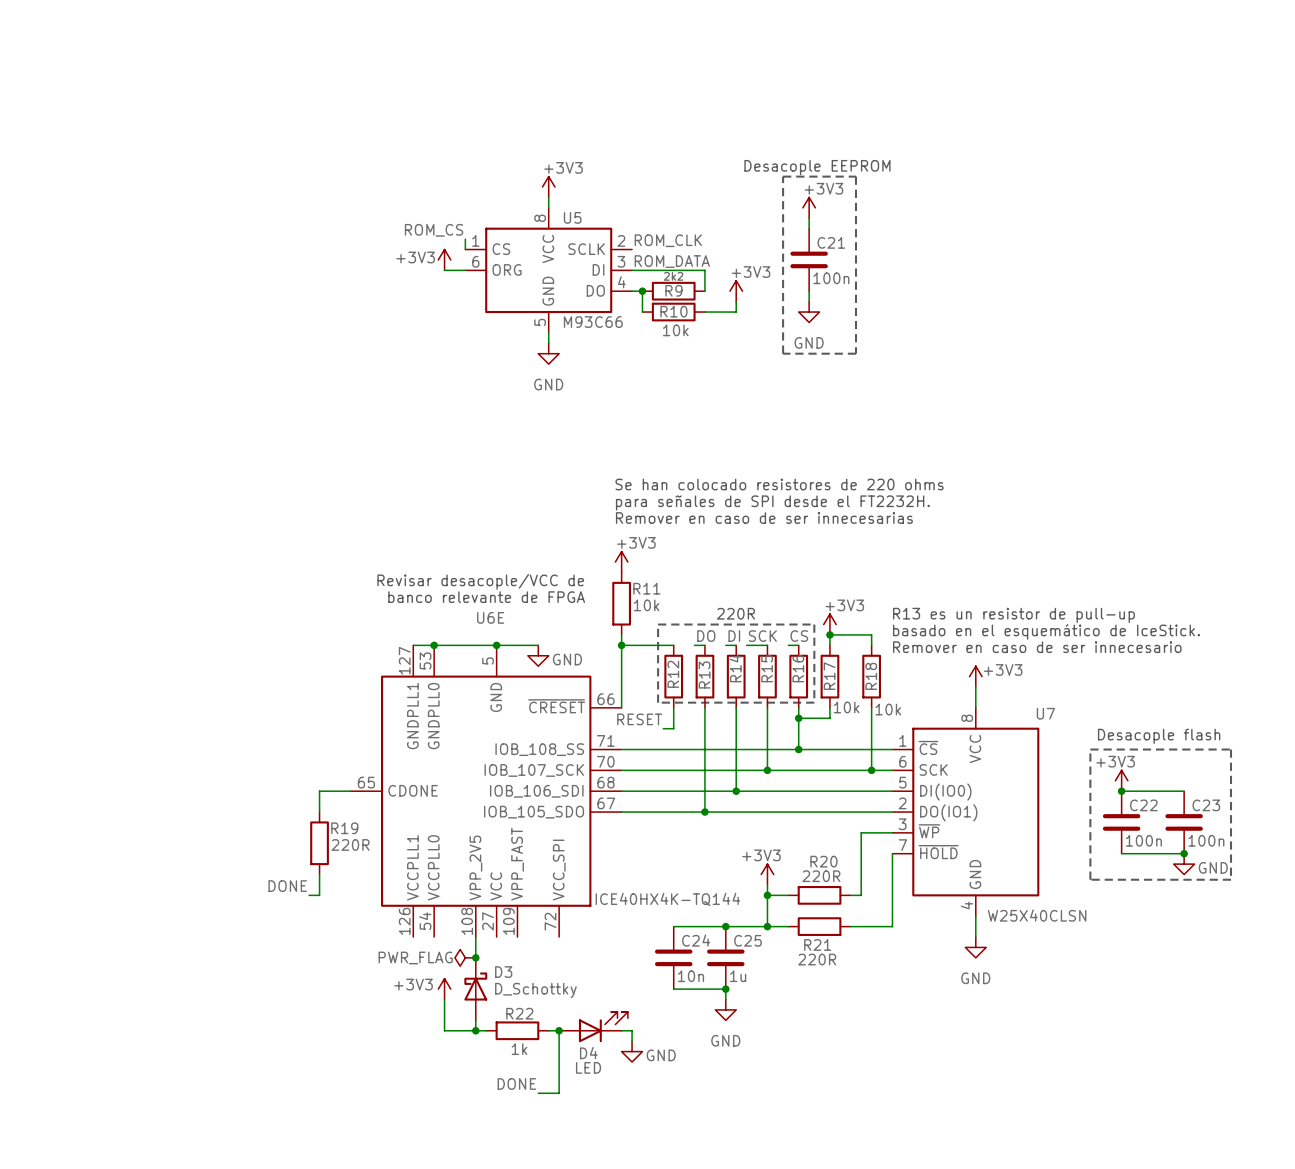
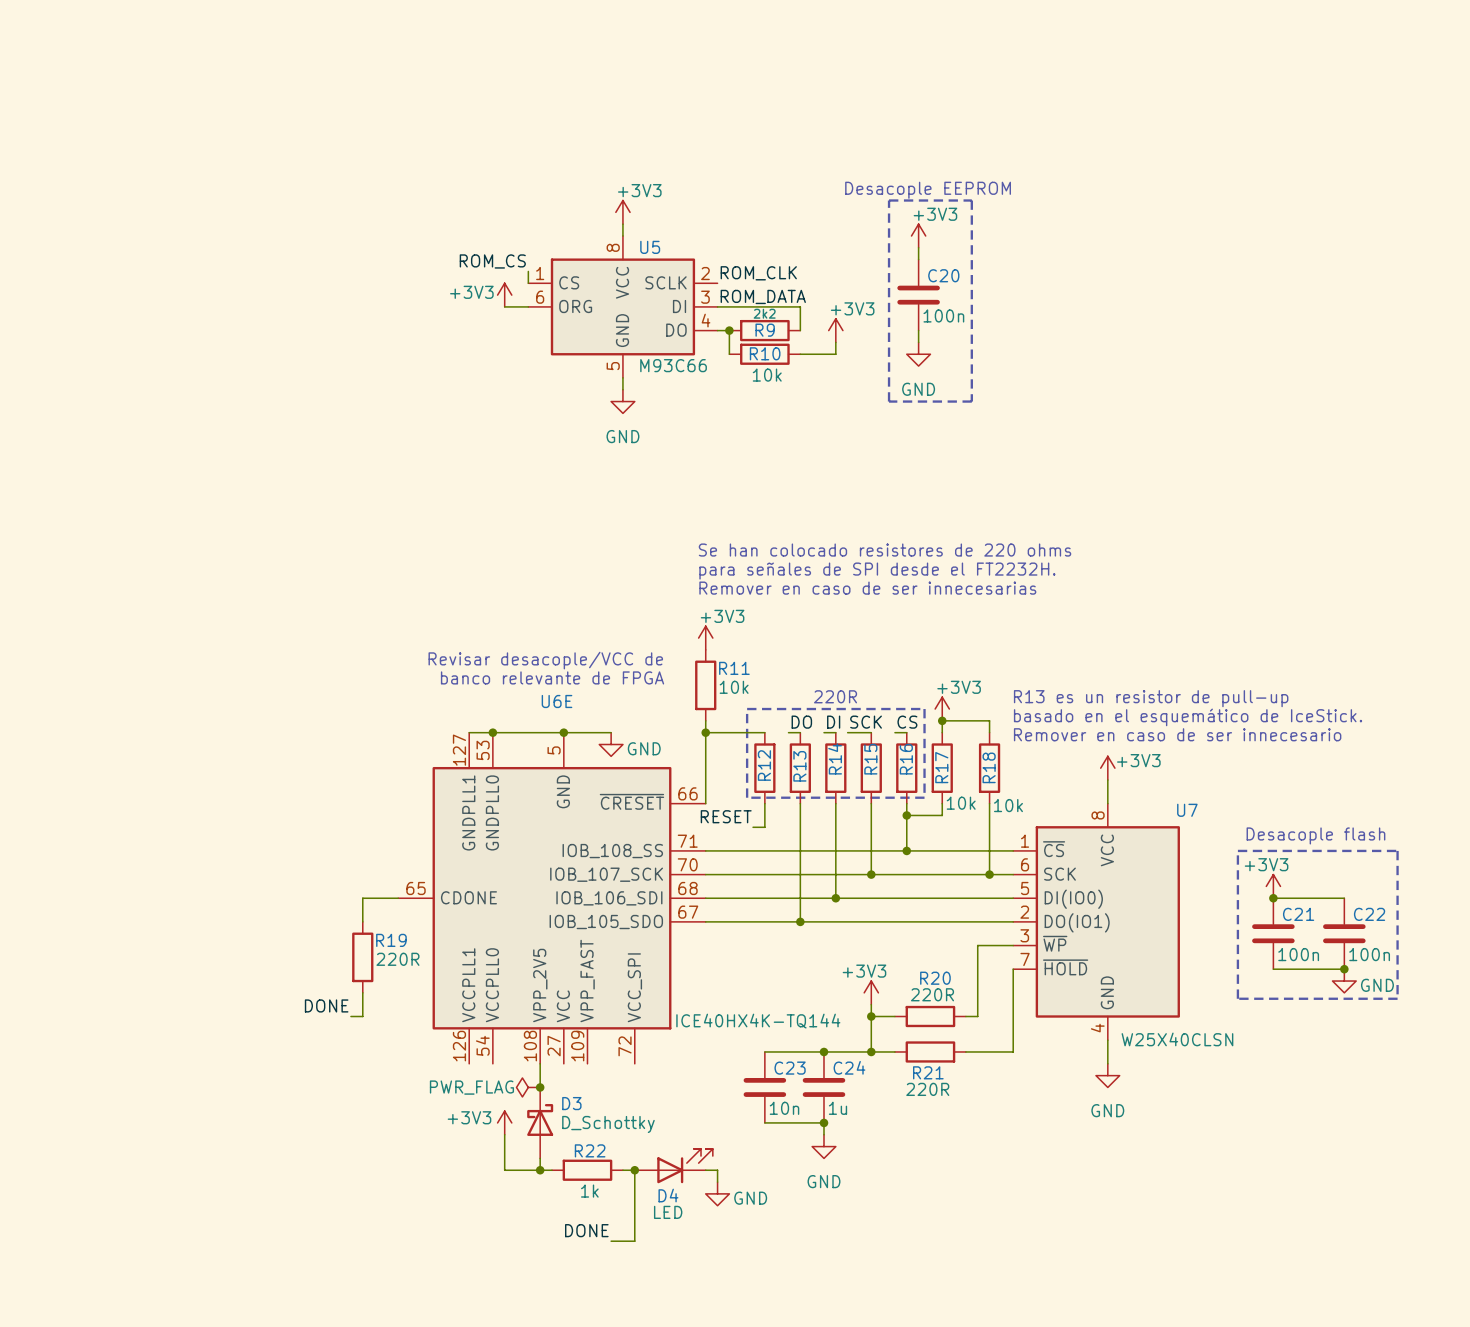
C21 name: C21 (831, 242) -> C20 (943, 275)
C22 name: C22 (1143, 805) -> C21 (1298, 914)
C23 name: C23 (1206, 805) -> C22 (1369, 914)
C24 name: C24 (696, 940) -> C23 (790, 1068)
C25 name: C25 (747, 940) -> C24 (849, 1067)

